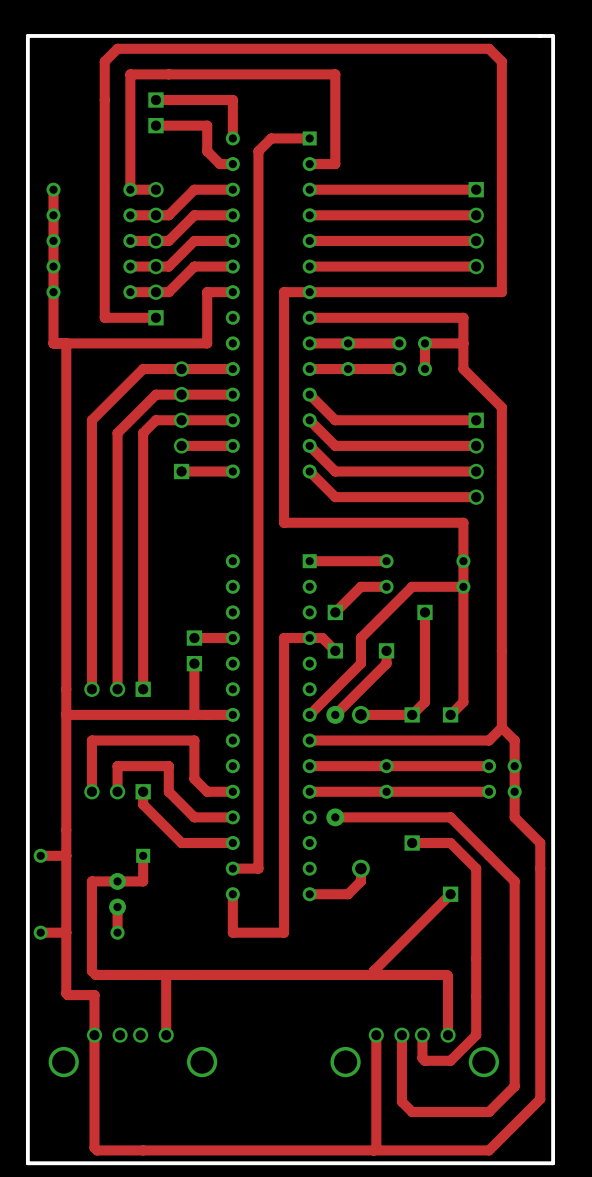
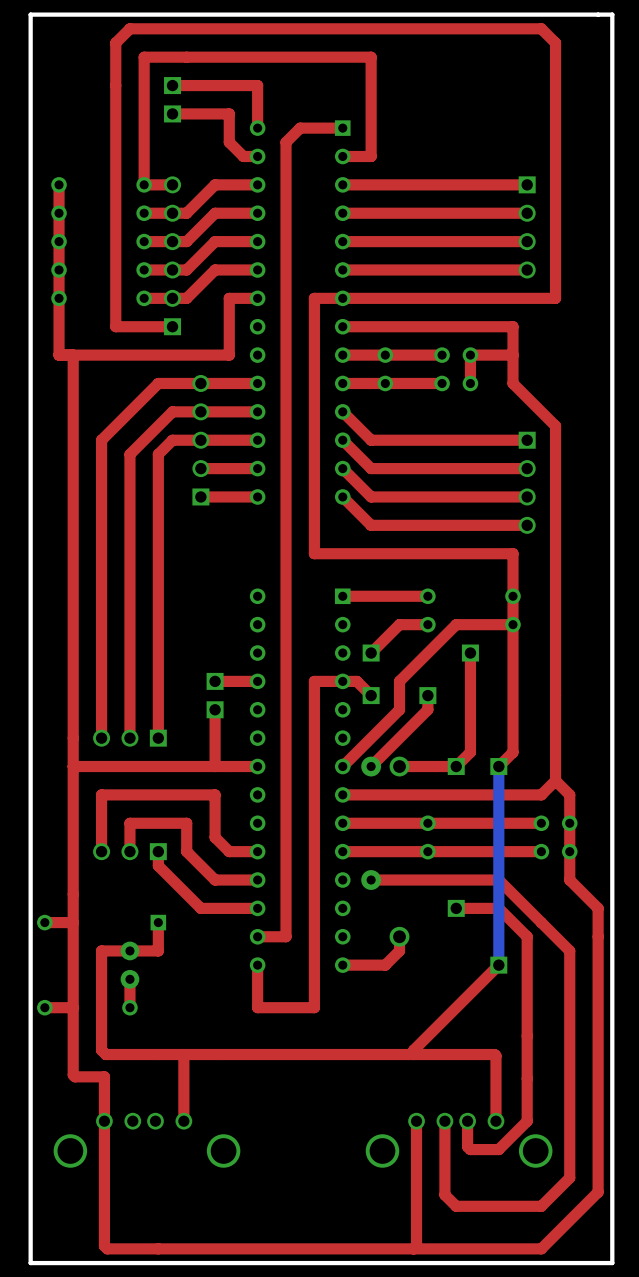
bottom track: none -> (498, 766) (498, 965)

